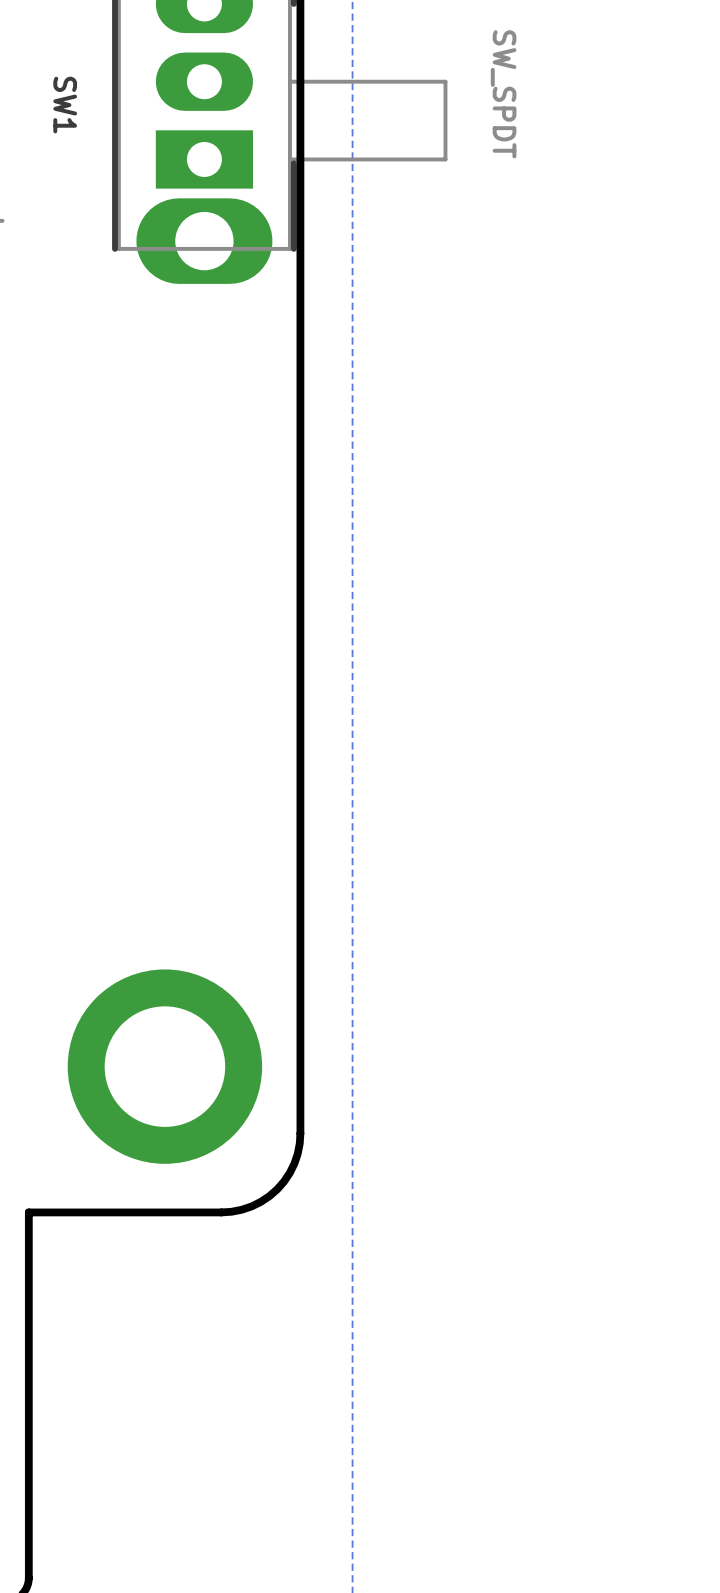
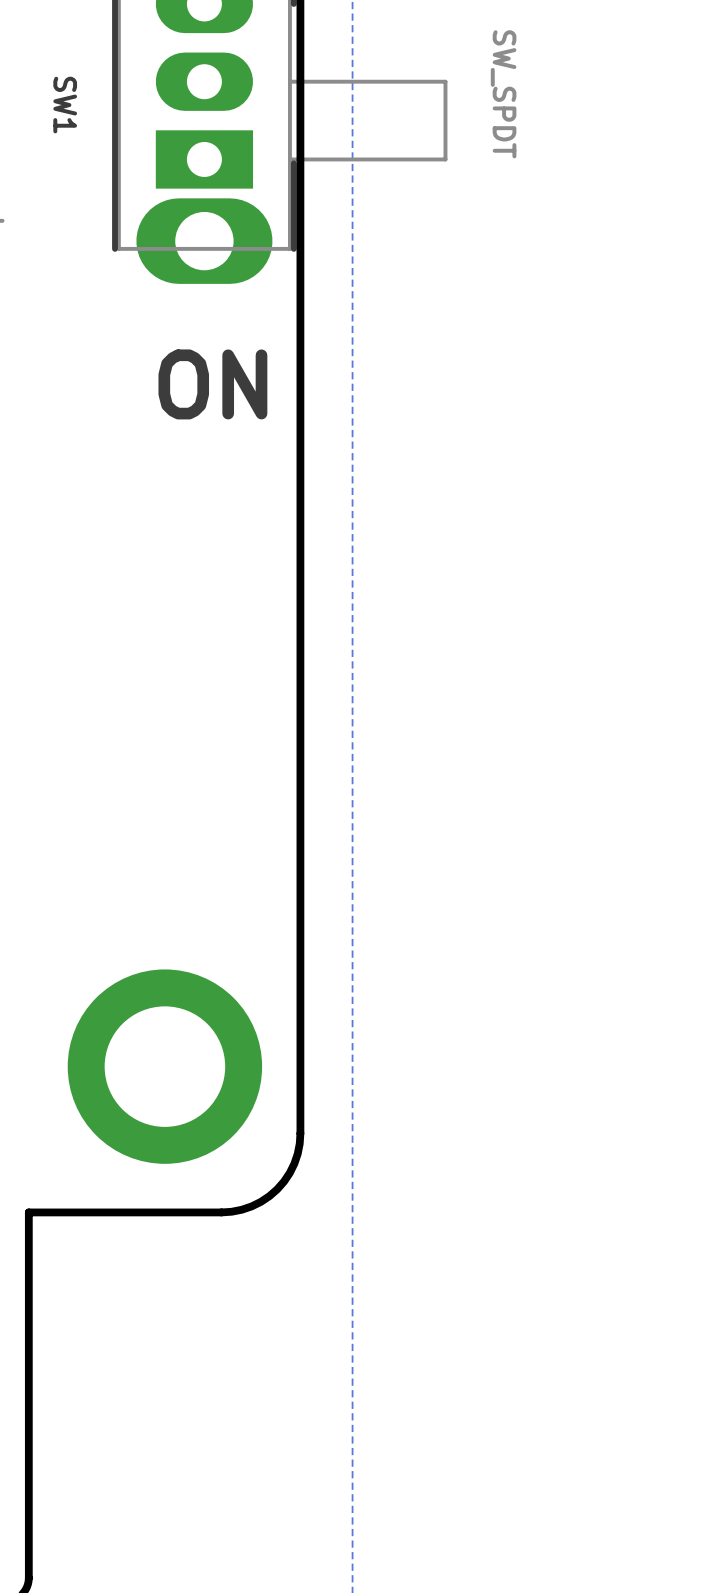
text: none -> ON (212, 384)

